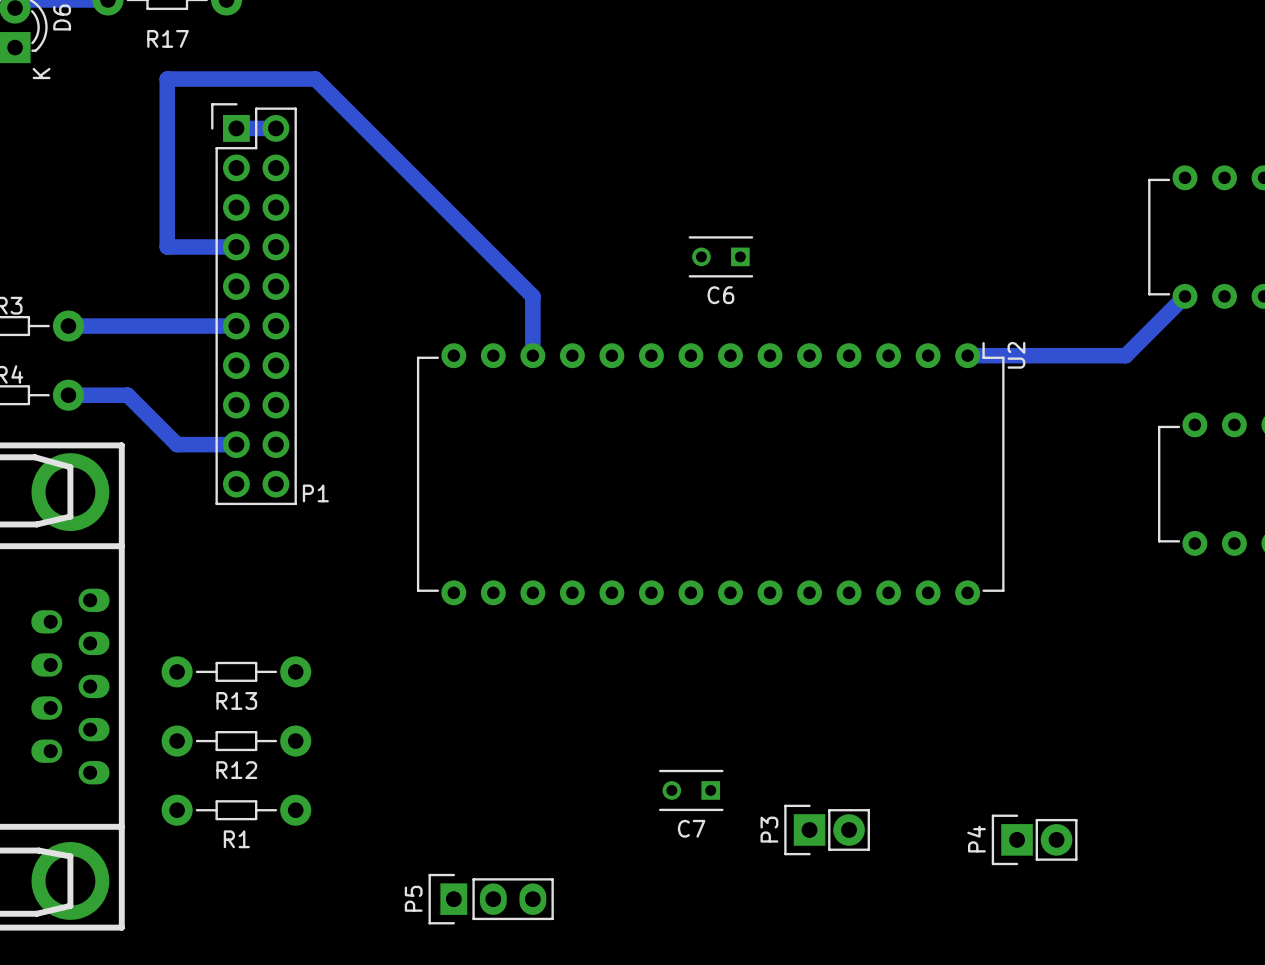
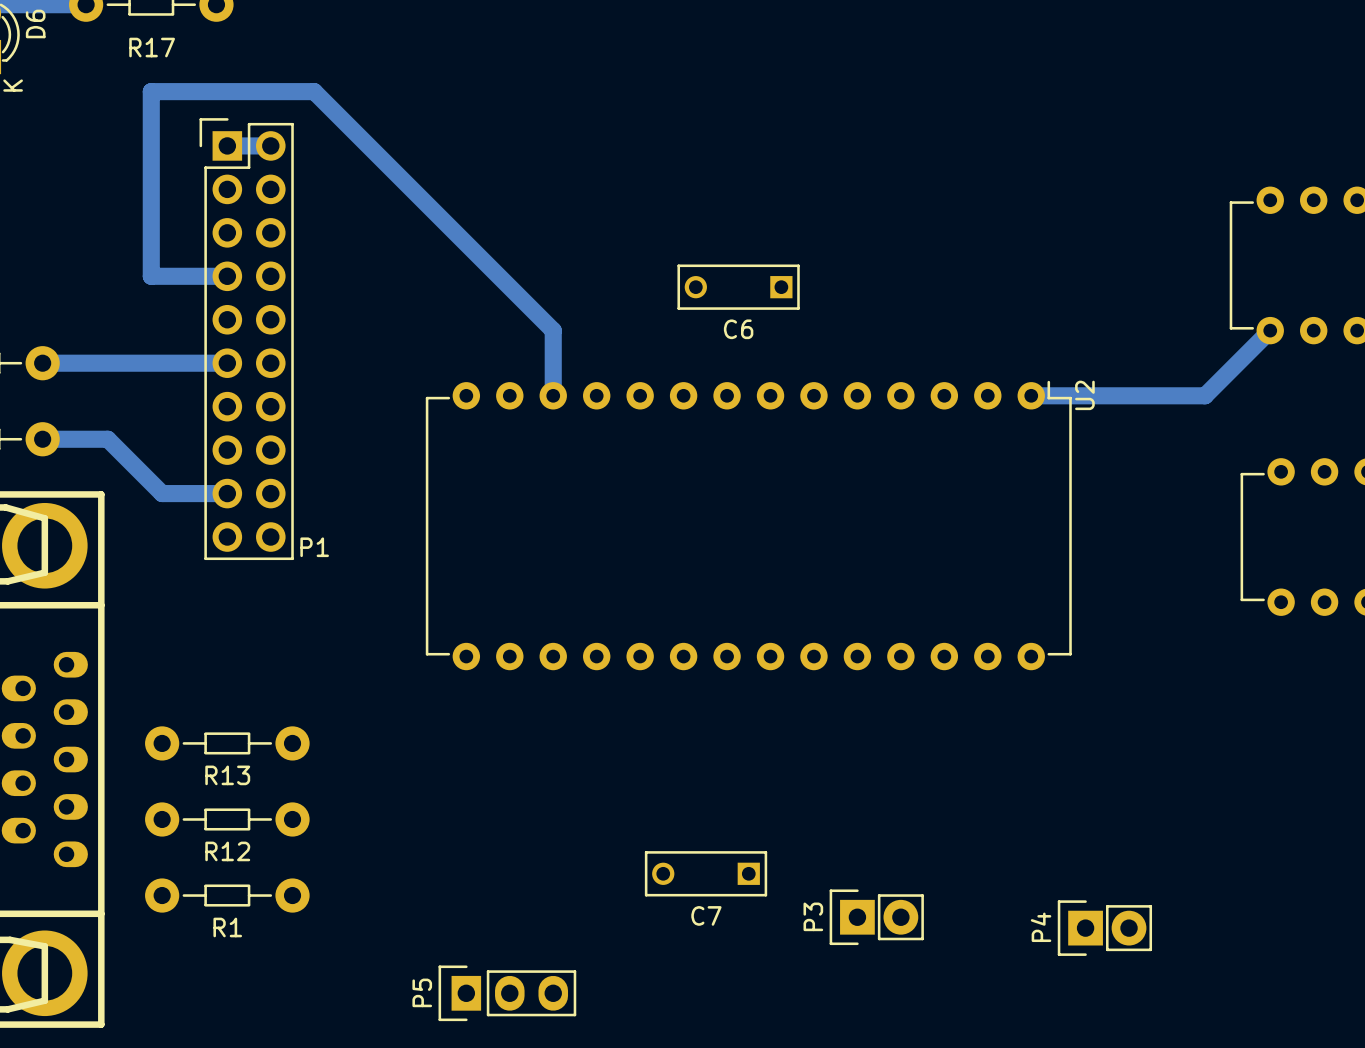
C6 footprint: [688, 236, 754, 278] -> [677, 264, 800, 310]
C7 footprint: [658, 769, 724, 812] -> [644, 851, 768, 897]

